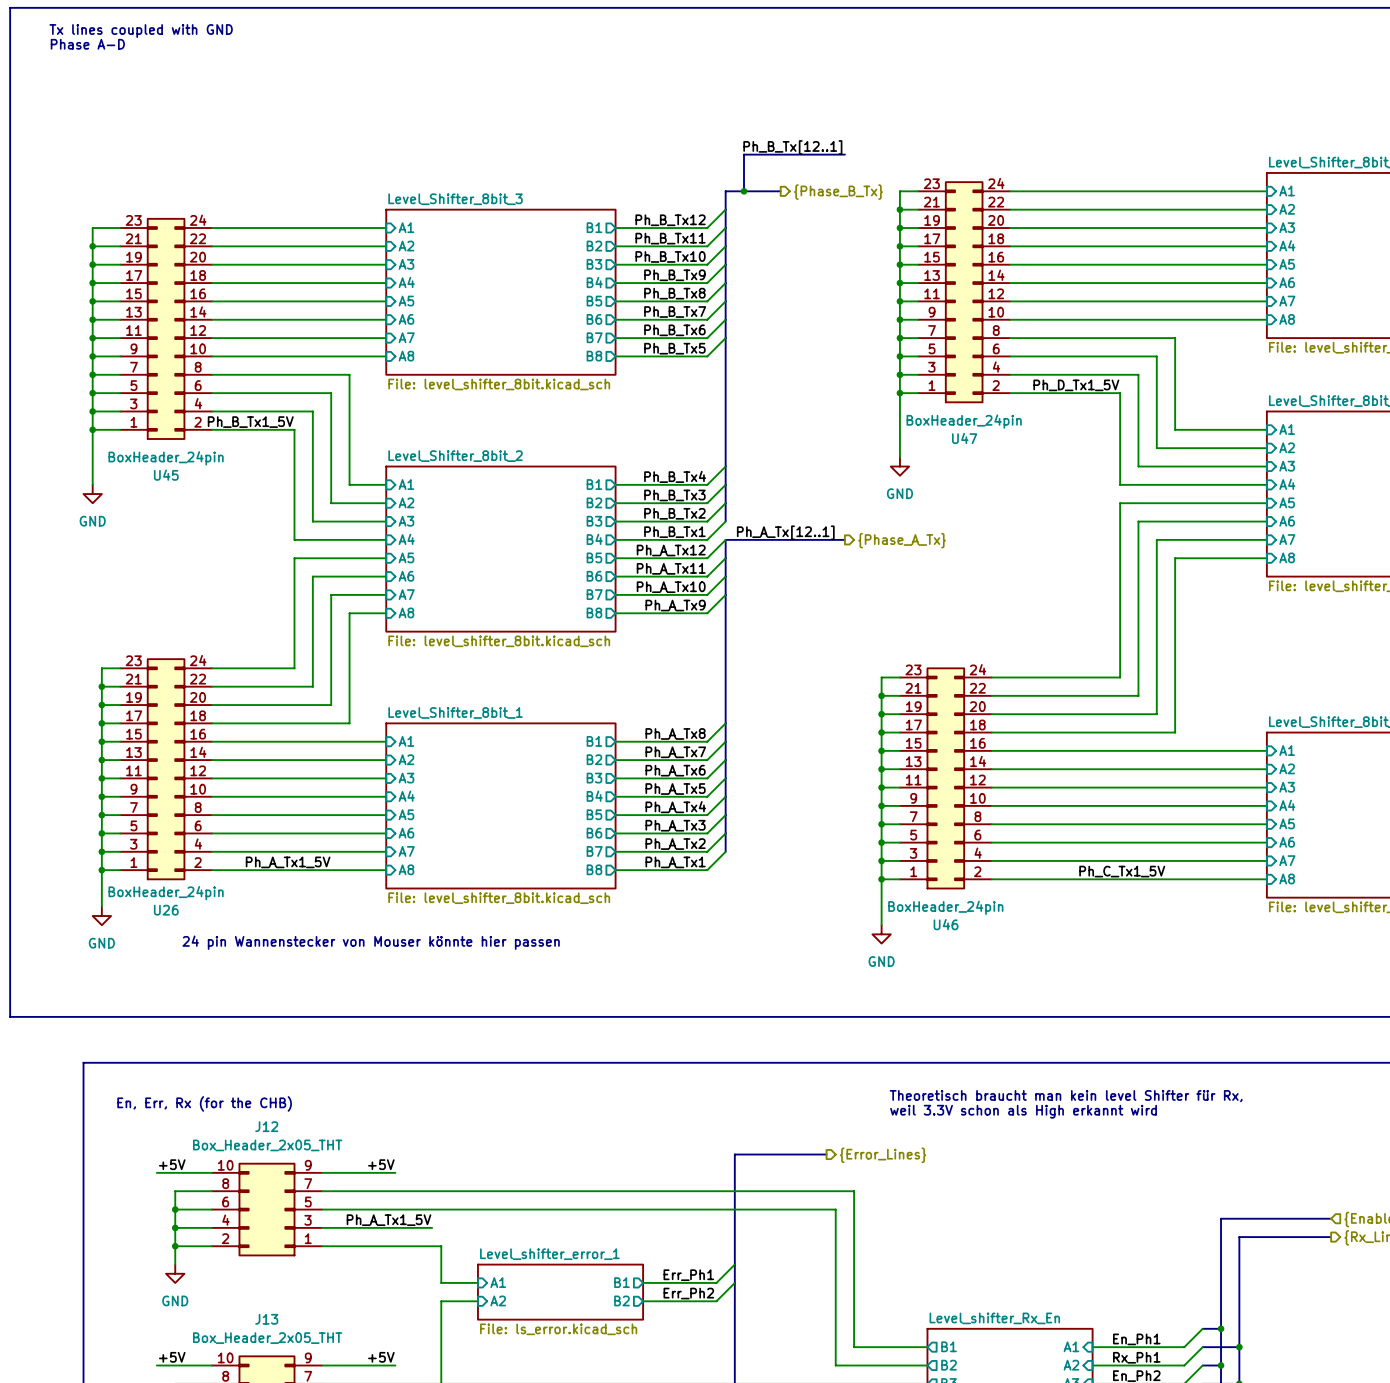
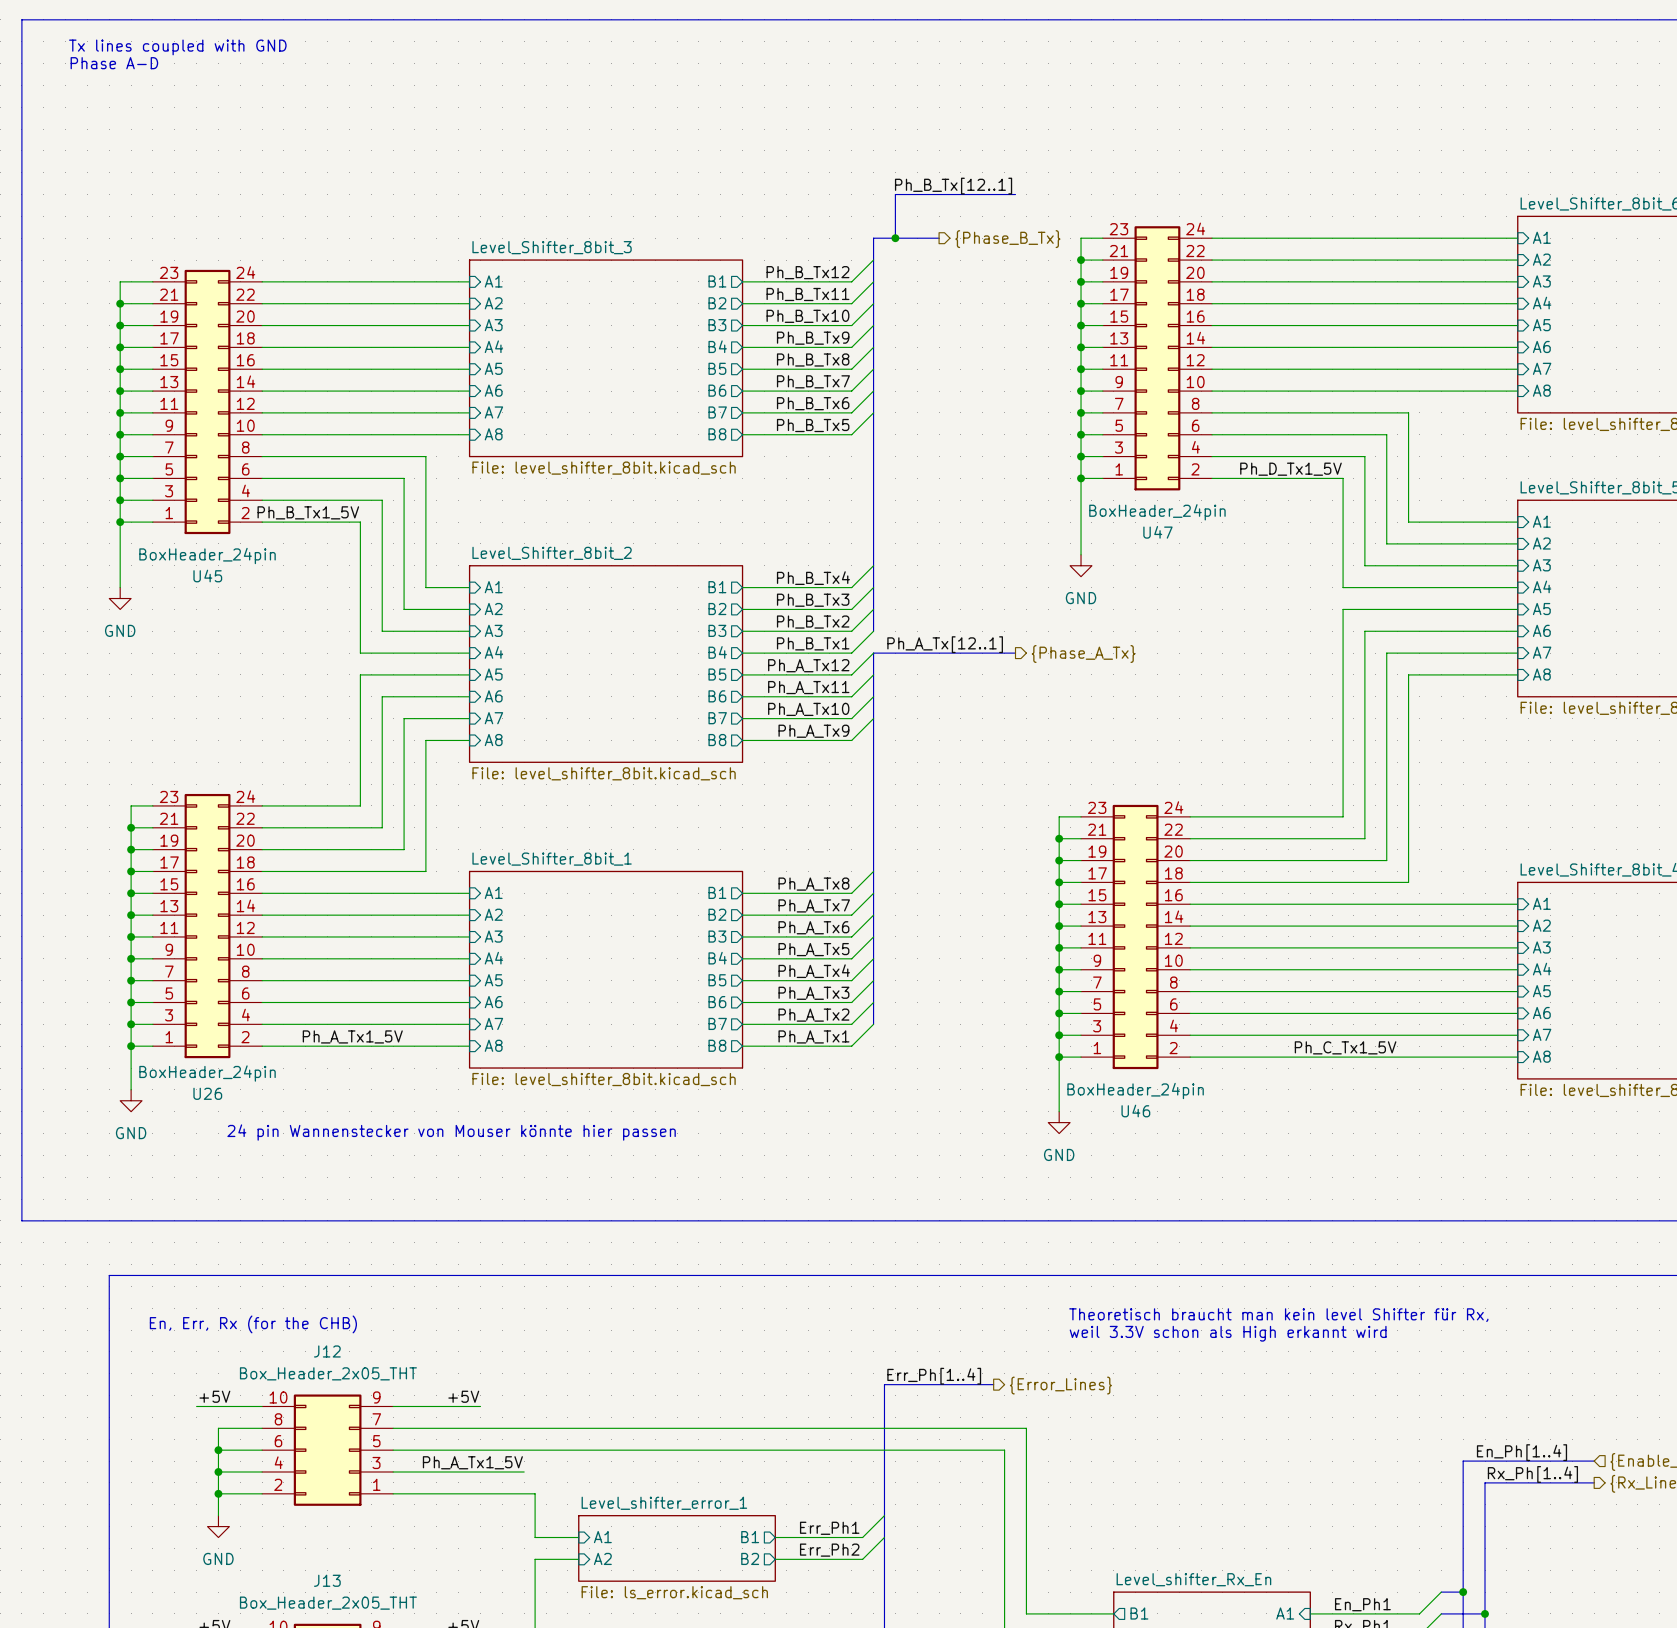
label: none -> Err_Ph[1..4] (934, 1376)
label: none -> En_Ph[1..4] (1521, 1452)
label: none -> Rx_Ph[1..4] (1532, 1474)

